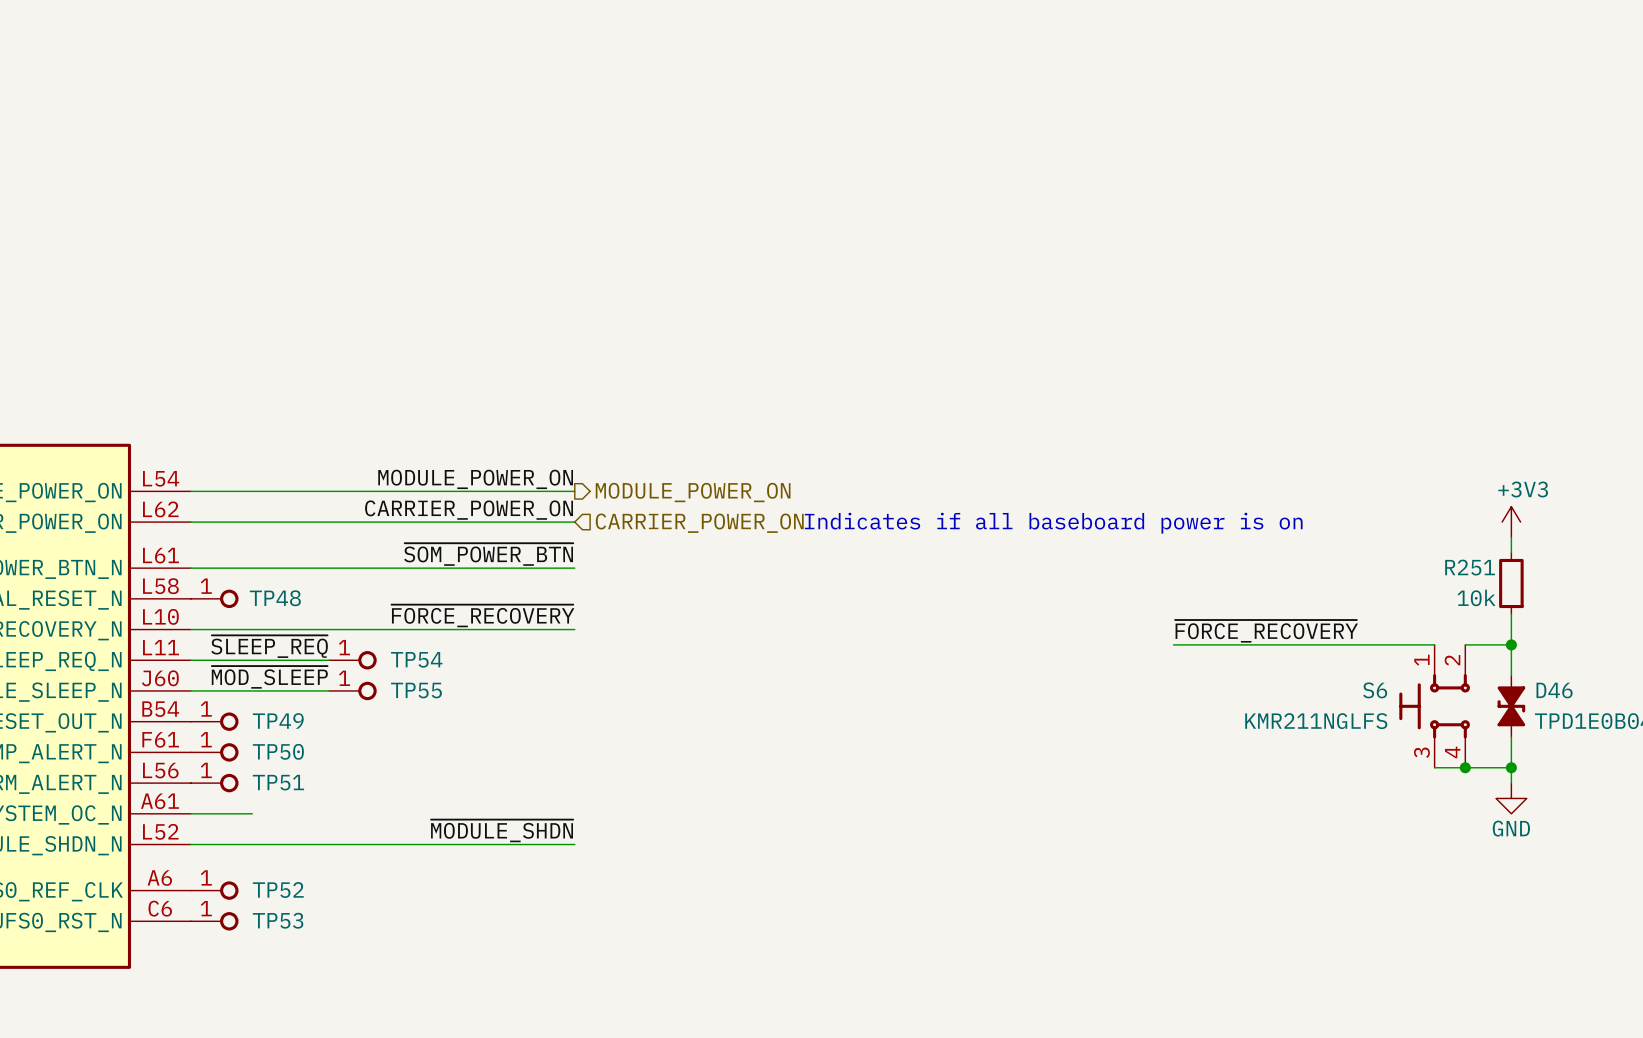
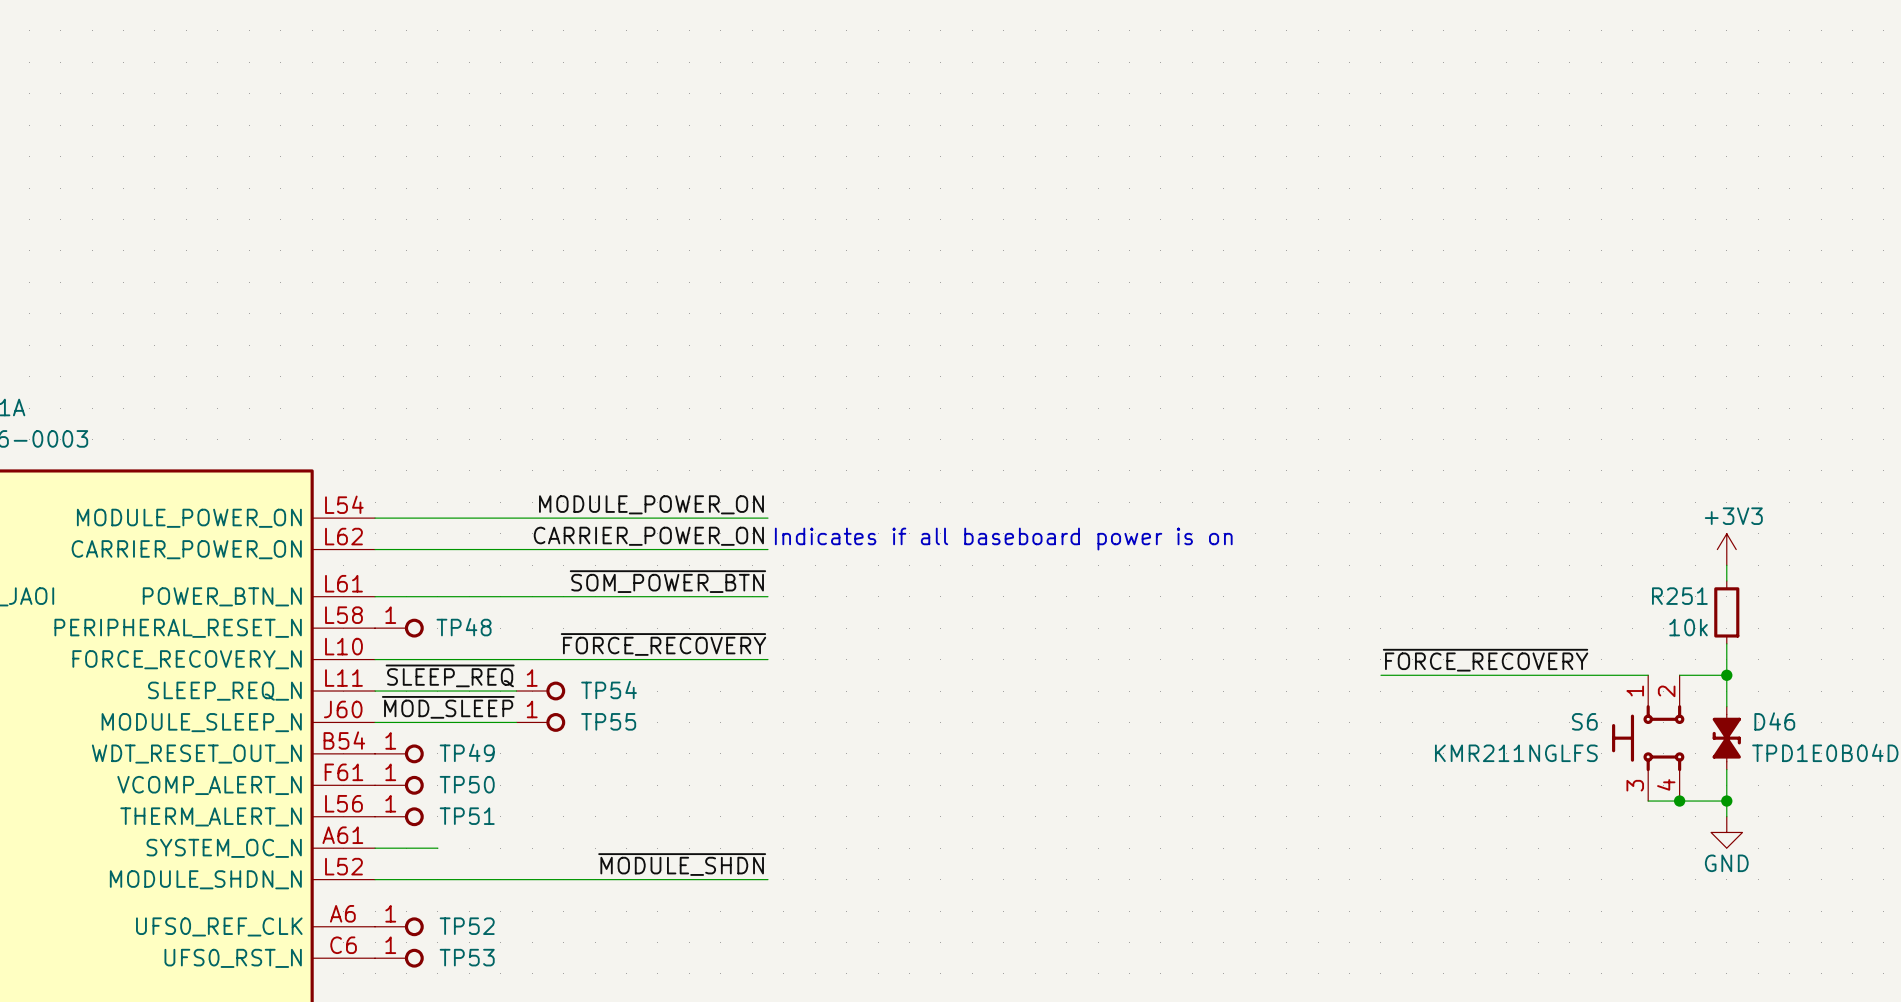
hierarchical label: MODULE_POWER_ON (693, 492) -> none
hierarchical label: CARRIER_POWER_ON (699, 523) -> none
text position: Indicates if all baseboard power is on (1053, 523) -> Indicates if all baseboard power is on (1003, 539)

